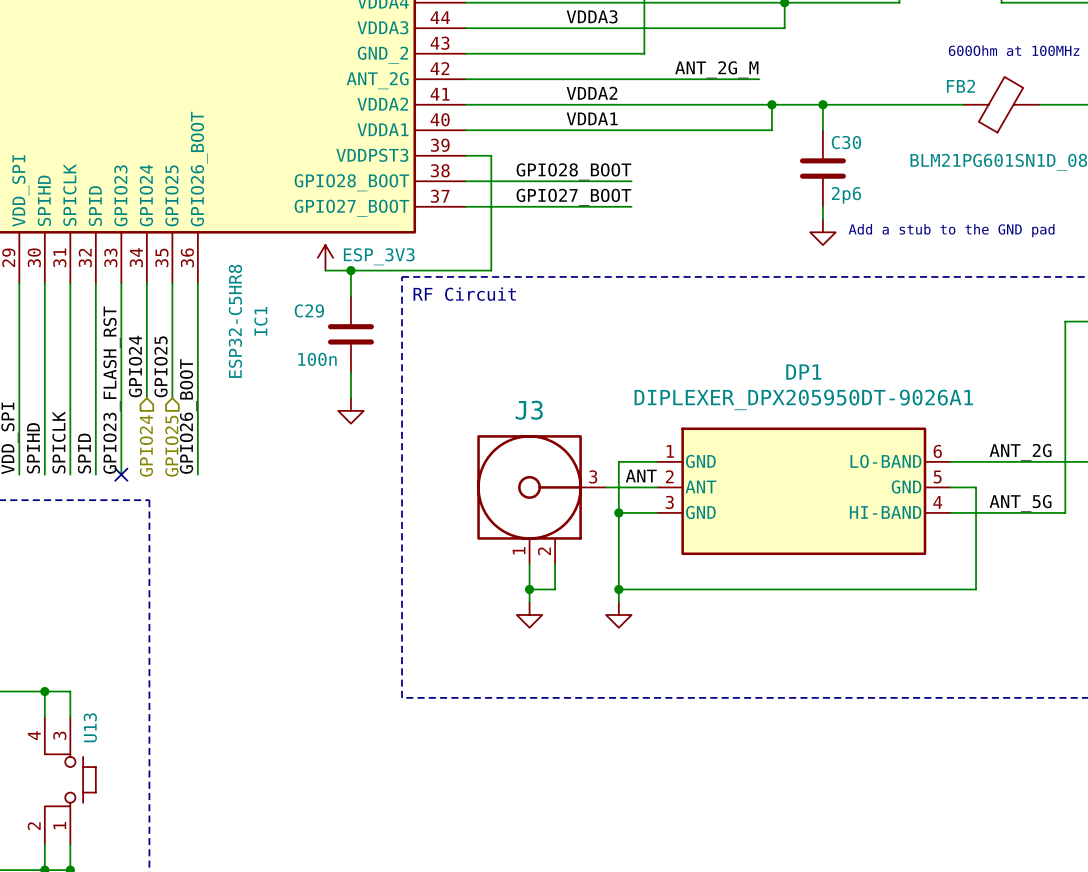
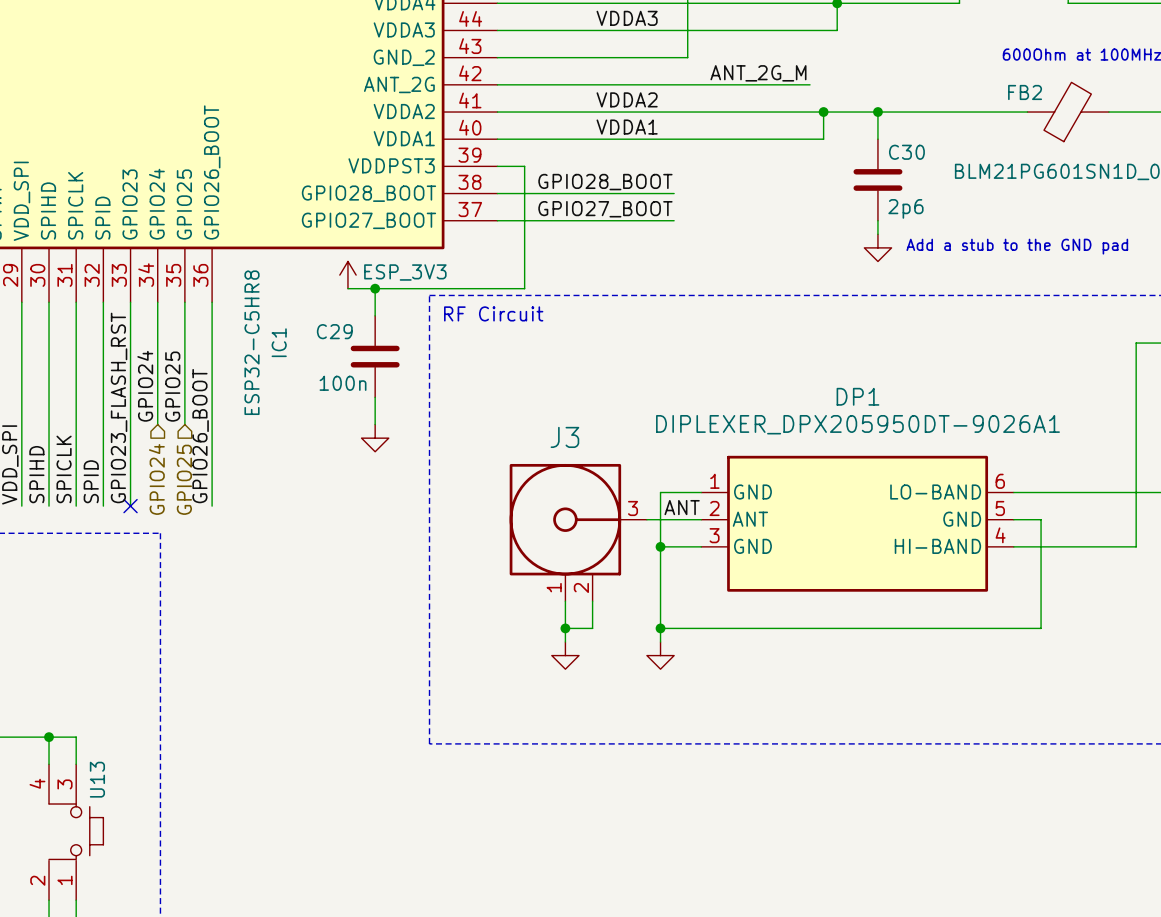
label: ANT_2G (1020, 452) -> none
label: ANT_5G (1020, 503) -> none

